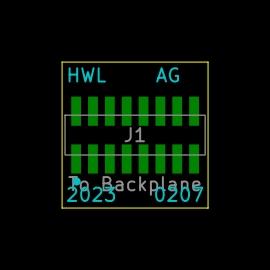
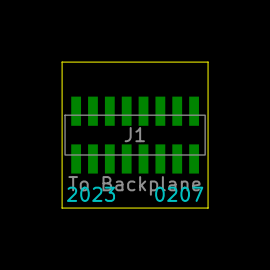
text: HWL (87, 74) -> none
text: AG (167, 74) -> none
drawing: [72, 177, 81, 186] -> none

